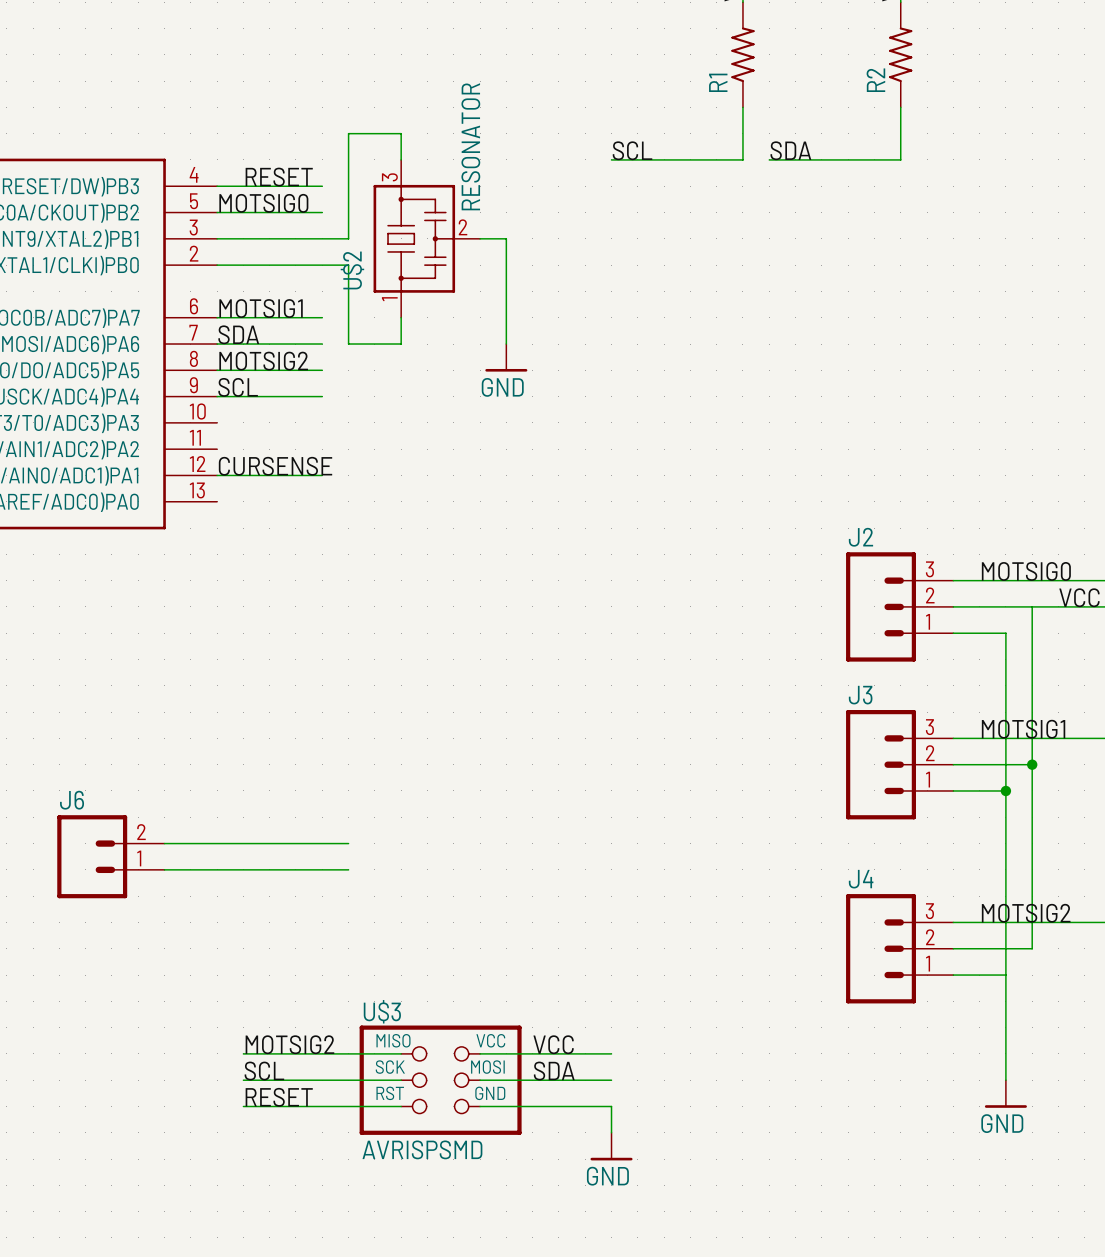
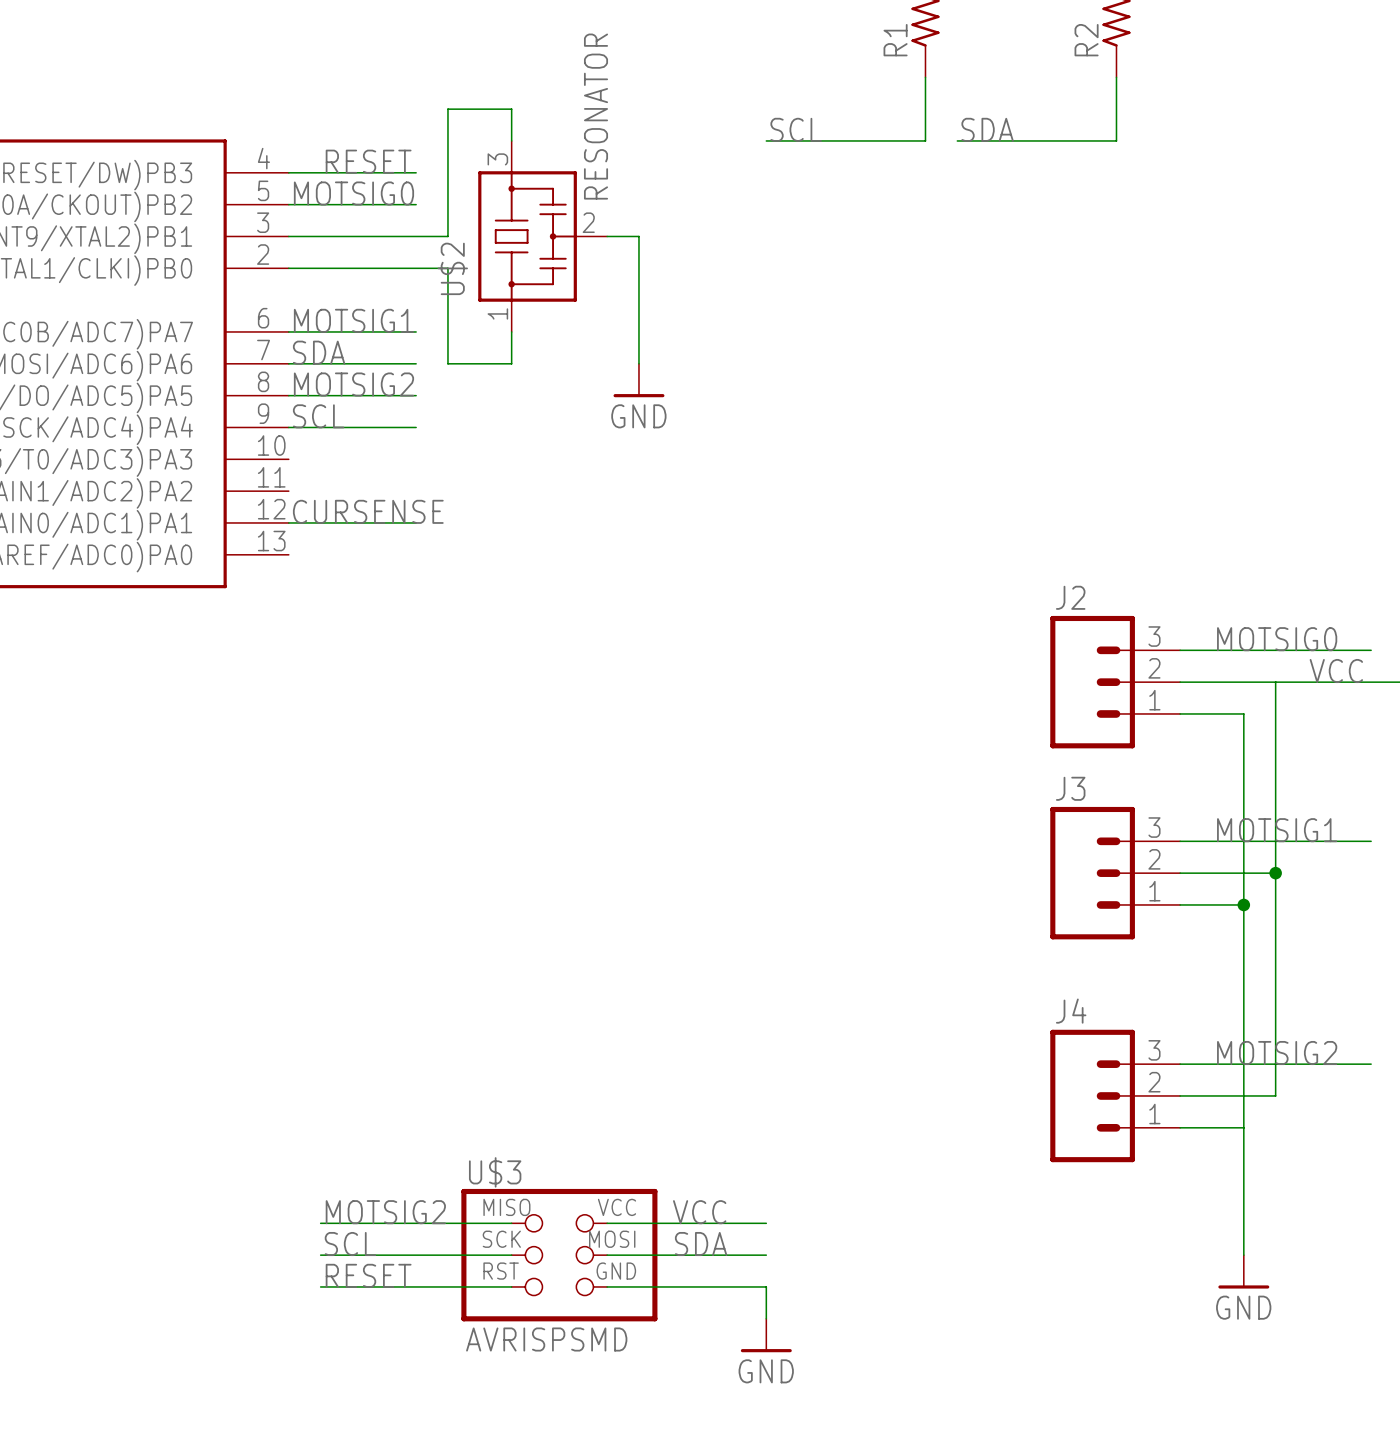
wire: (164, 843) (348, 843) -> none
J6: (110, 856) -> none
wire: (164, 869) (348, 869) -> none

